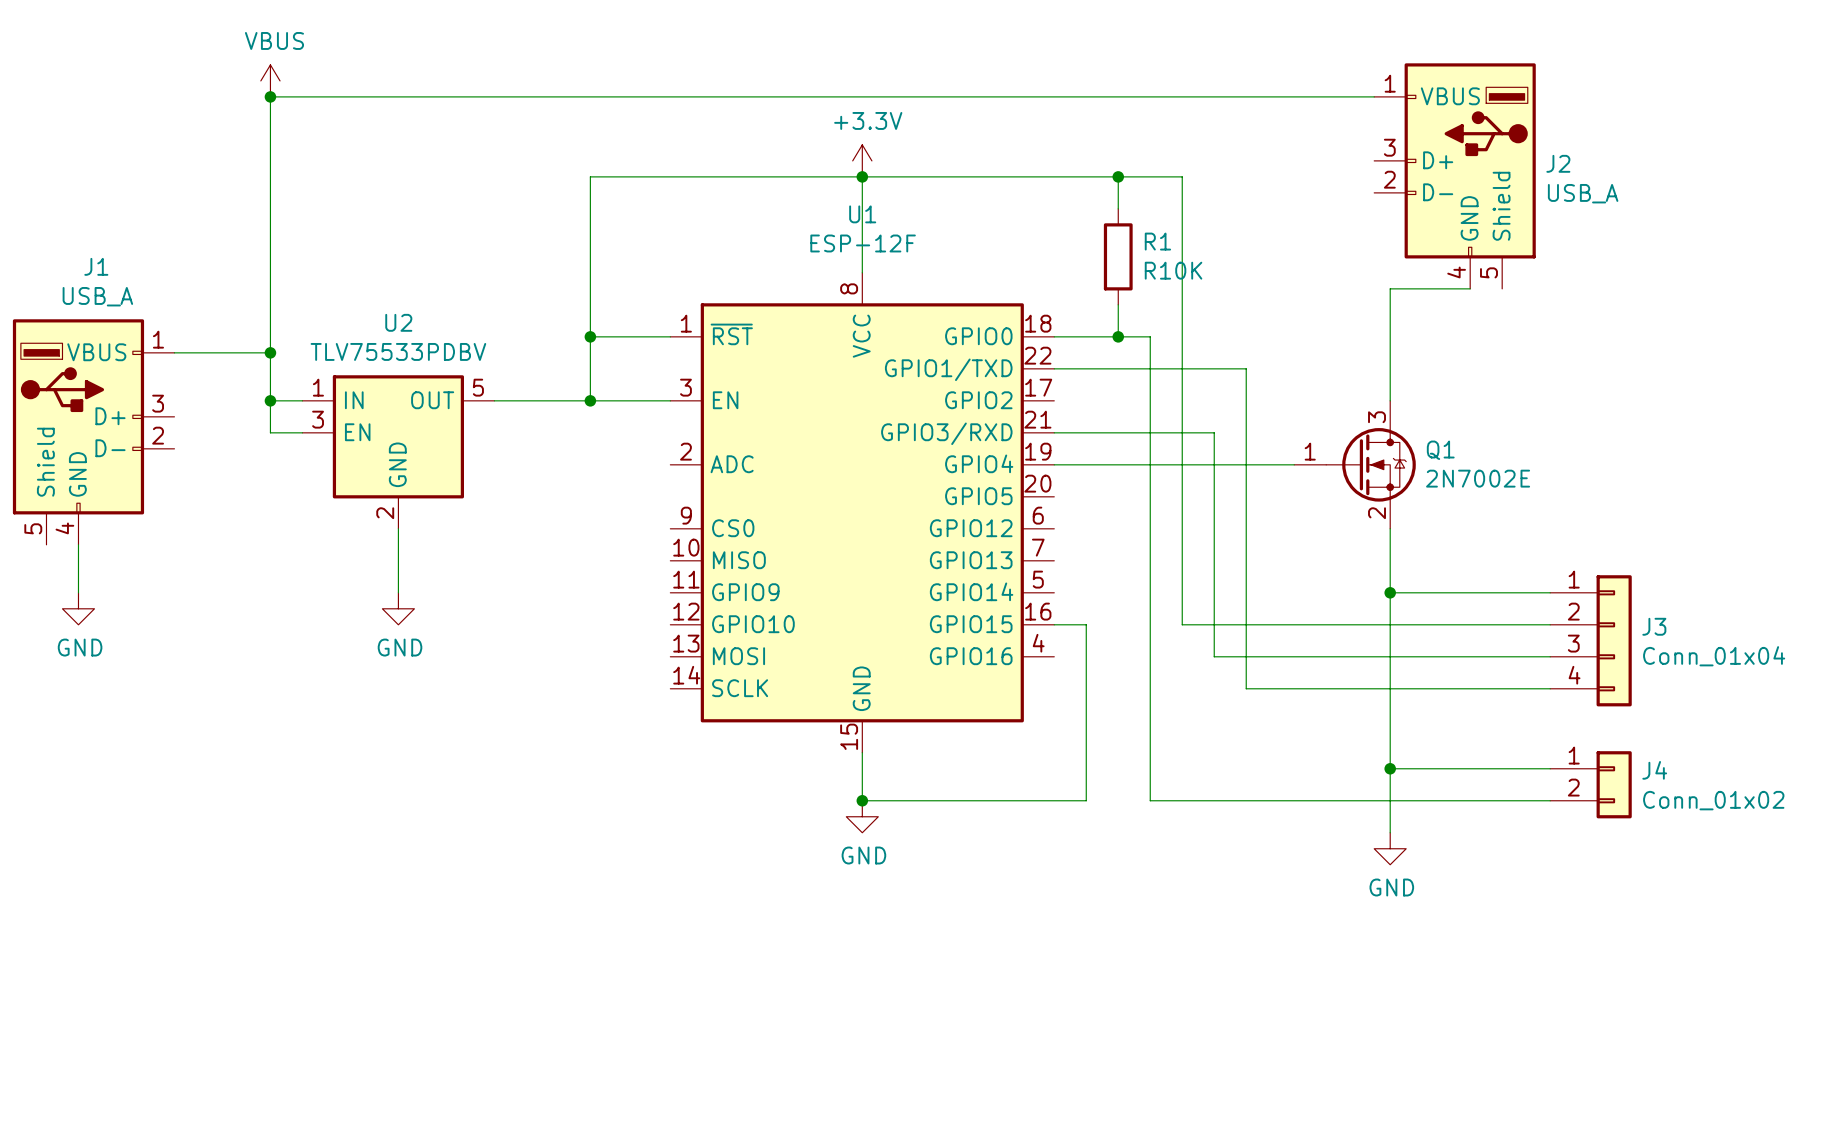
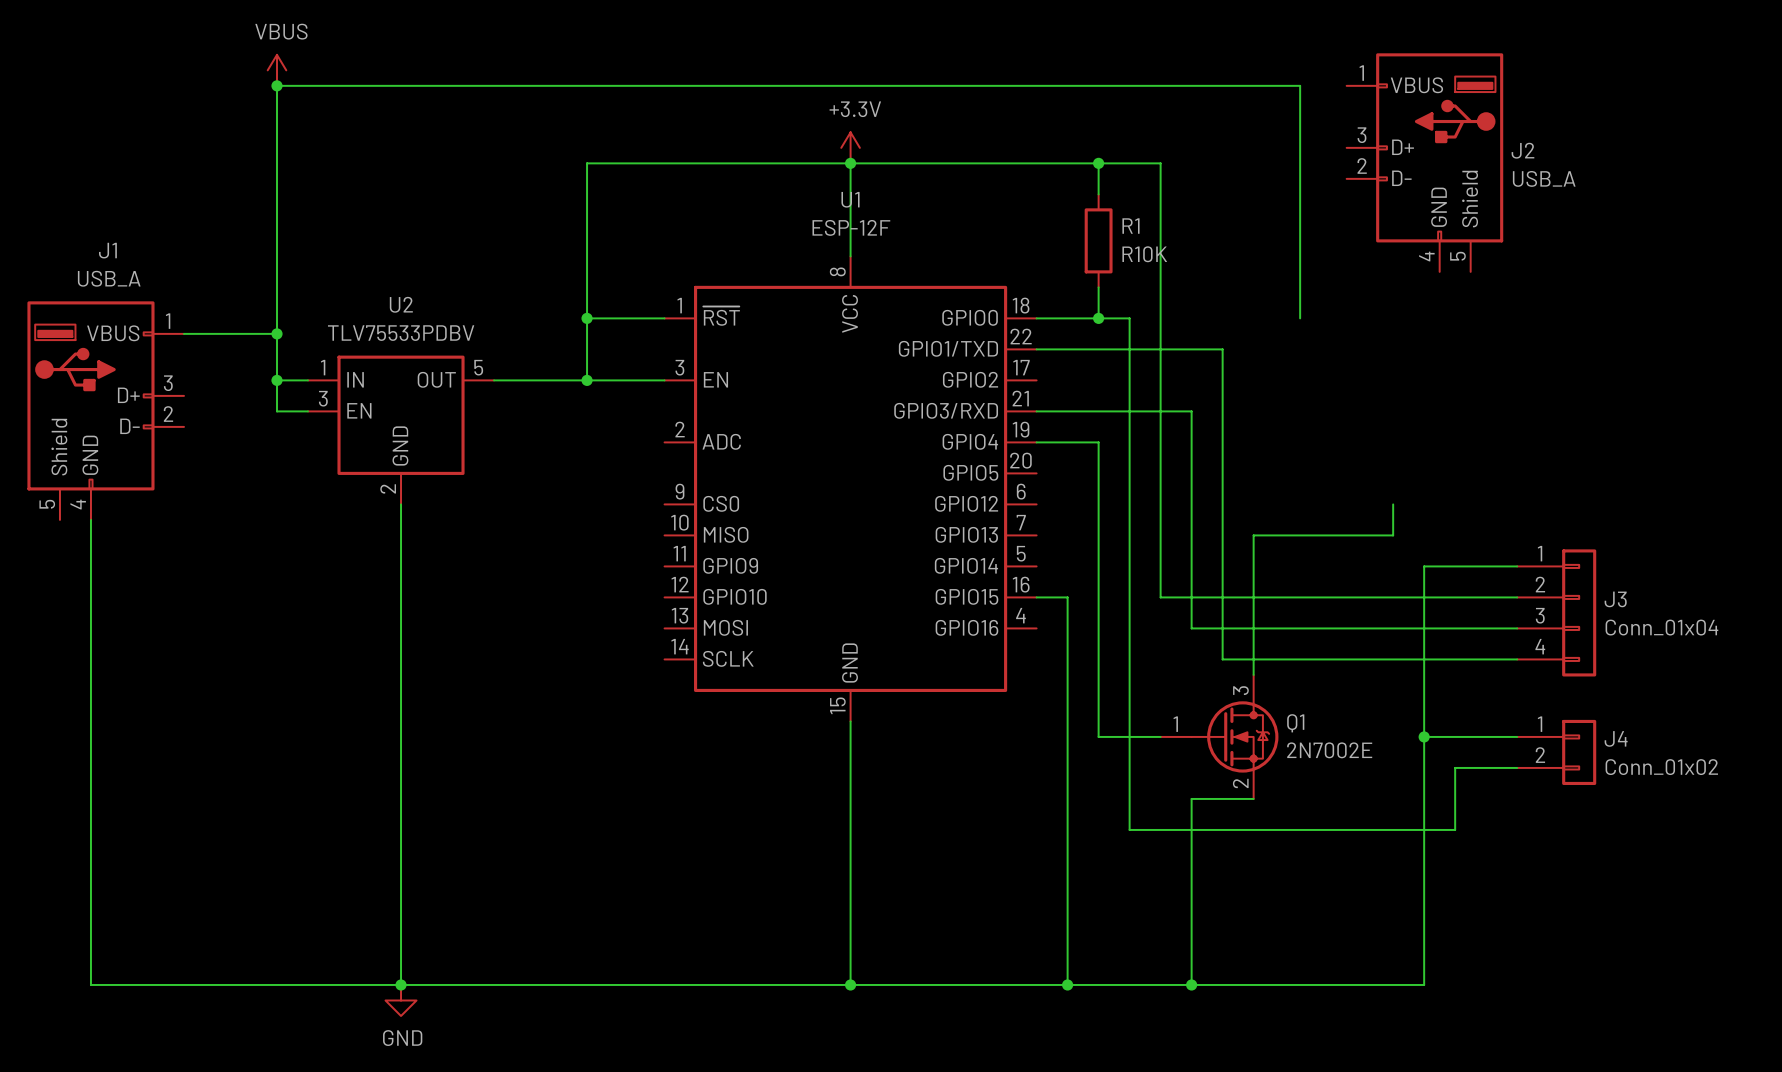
wire: (1326, 96) (1374, 96) -> (1300, 85) (1300, 318)
wire: (1470, 288) (1390, 288) (1390, 400) -> none
wire: (1118, 464) (1294, 464) -> (1098, 442) (1098, 736) (1160, 736)
Q1 position: (1355, 464) -> (1219, 736)
wire: (1390, 528) (1390, 832) -> none
wire: none -> (1393, 504) (1393, 535) (1253, 535) (1253, 674)
wire: none -> (401, 566) (401, 984)
wire: (1390, 592) (1454, 592) -> (90, 566) (90, 984) (1424, 984) (1424, 566)
junction: (1390, 592) -> none
power symbol: GND (78, 608) -> none
power symbol: GND (398, 608) -> none
wire: (1390, 768) (1454, 768) -> none
junction position: (1390, 768) -> (1424, 736)
wire: (862, 800) (1086, 800) -> (850, 767) (850, 984)
junction: (862, 800) -> none
wire: none -> (1067, 767) (1067, 984)
wire: (1150, 800) (1486, 800) -> (1129, 767) (1129, 829) (1455, 829) (1455, 767)
power symbol: GND (862, 816) -> none
wire: none -> (1253, 798) (1191, 798) (1191, 984)
power symbol: GND (1390, 848) -> none
junction: none -> (401, 984)
junction: none -> (850, 984)
junction: none -> (1067, 984)
junction: none -> (1191, 984)
power symbol: none -> GND (401, 1000)

